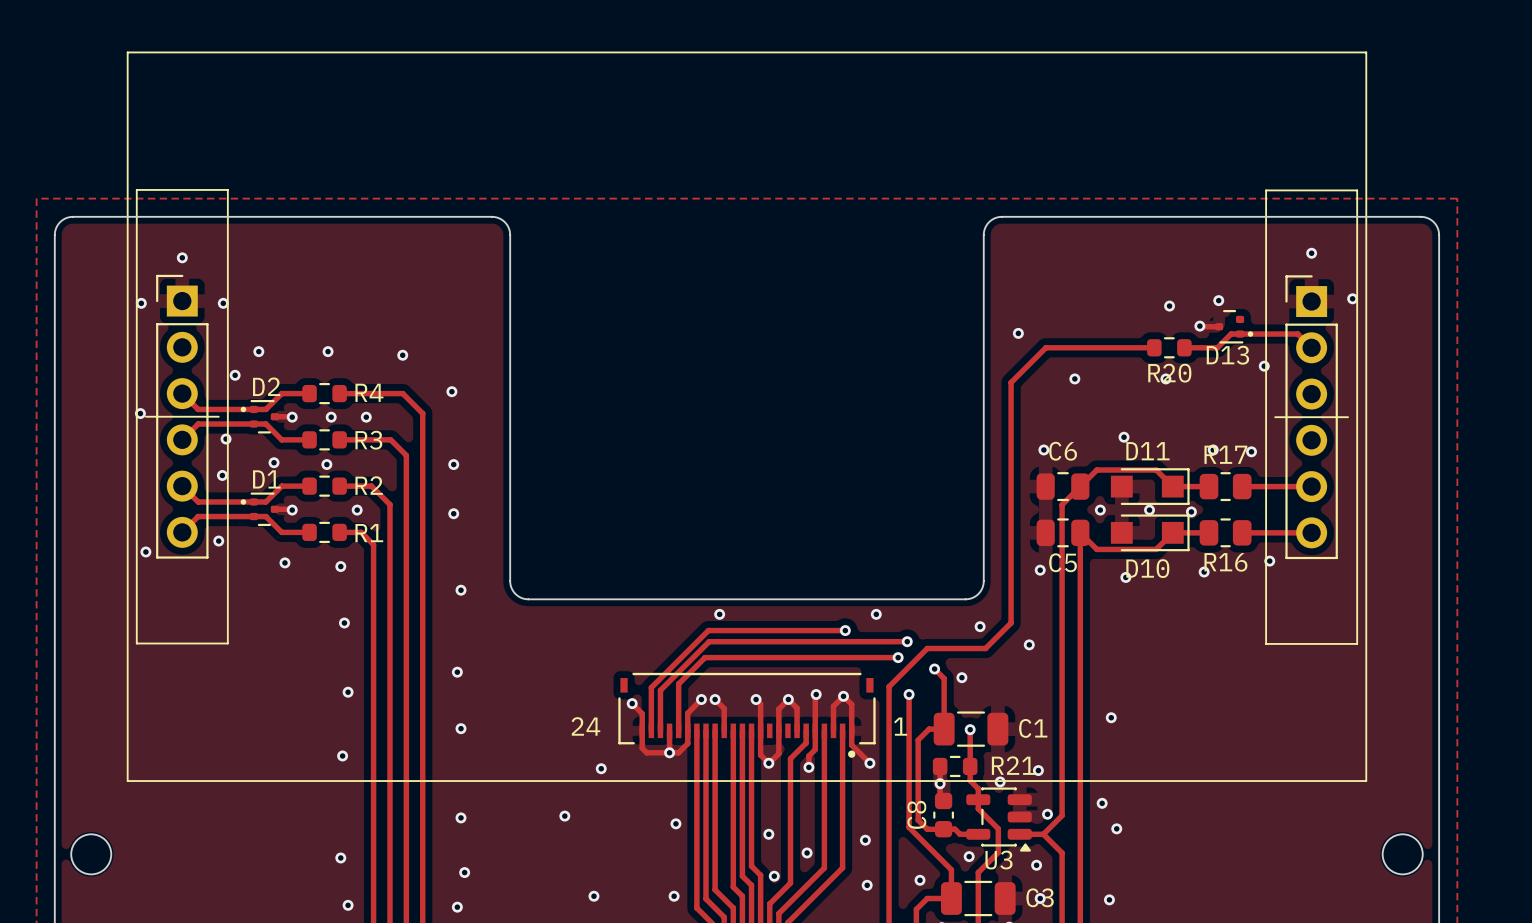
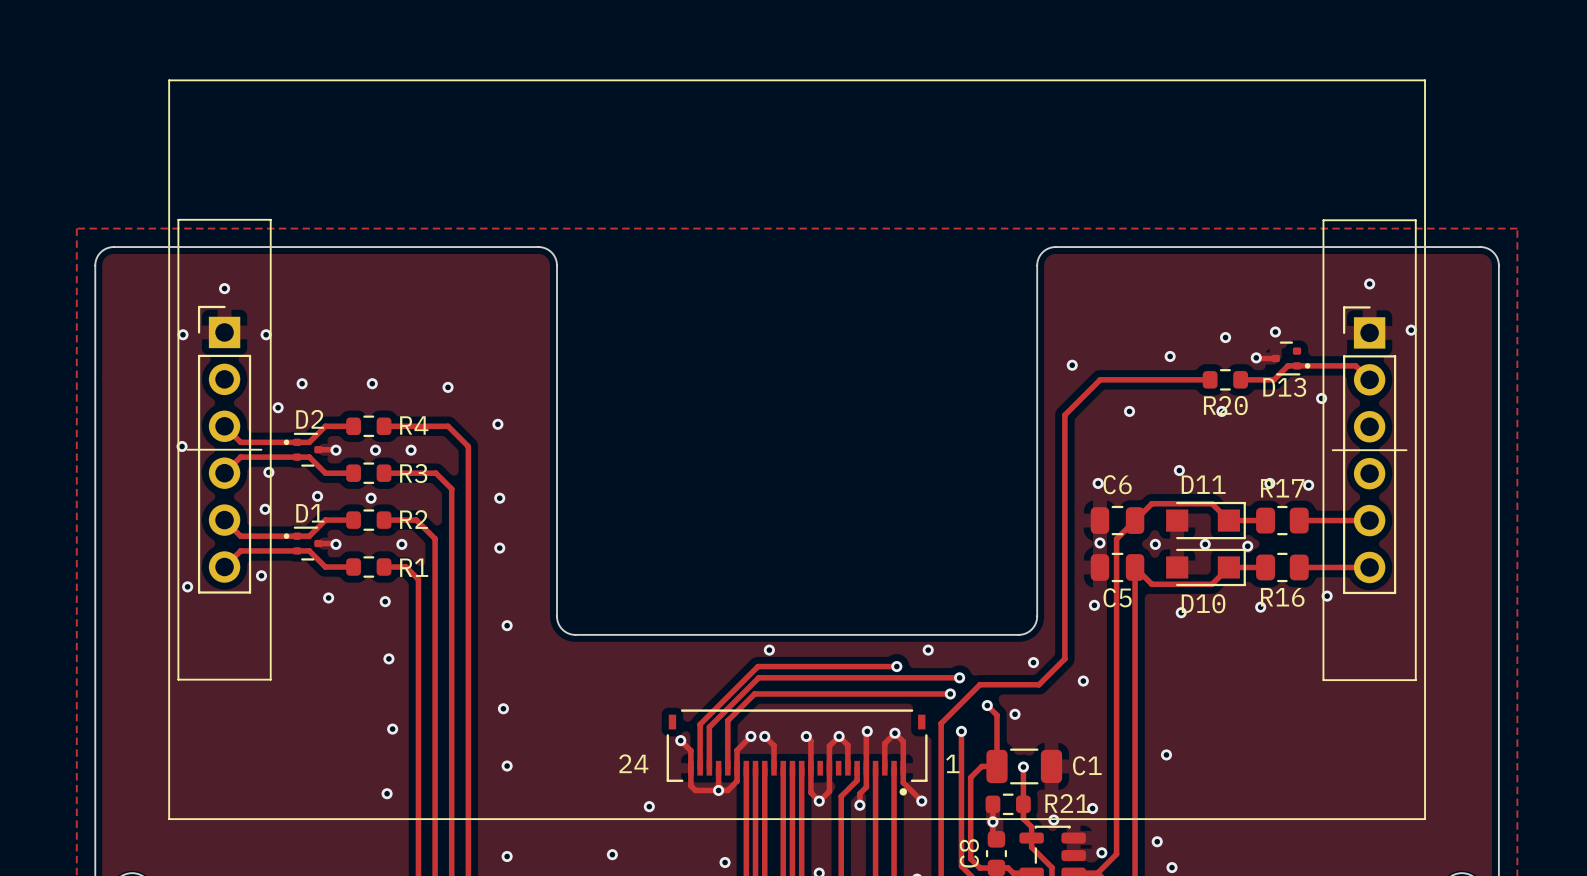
via: none -> (1170, 356)
via: none -> (1099, 543)

